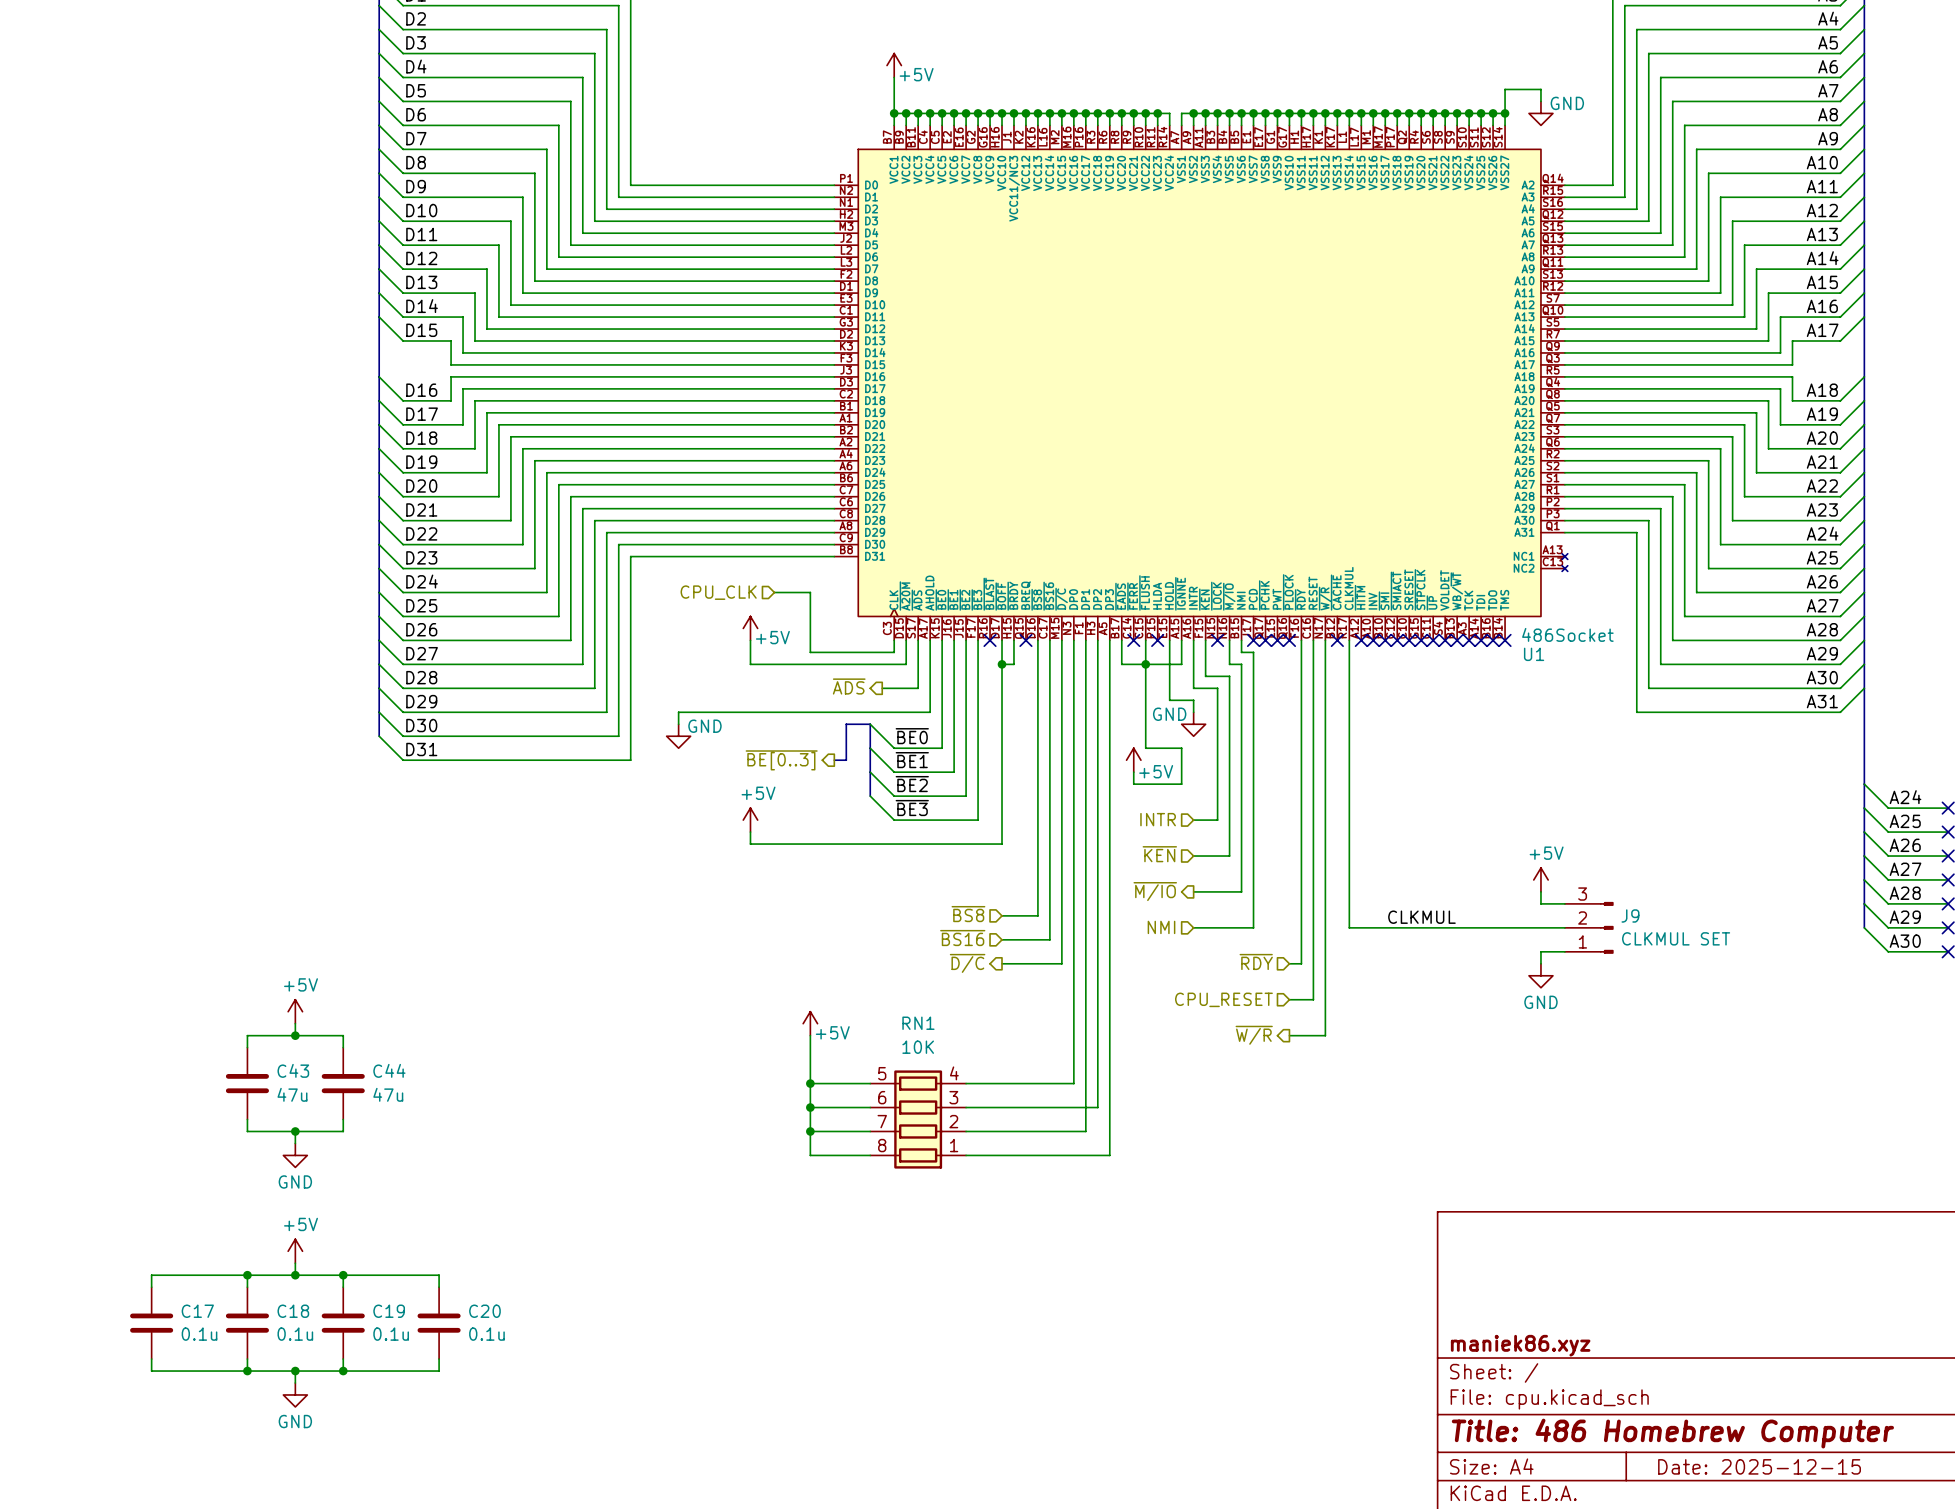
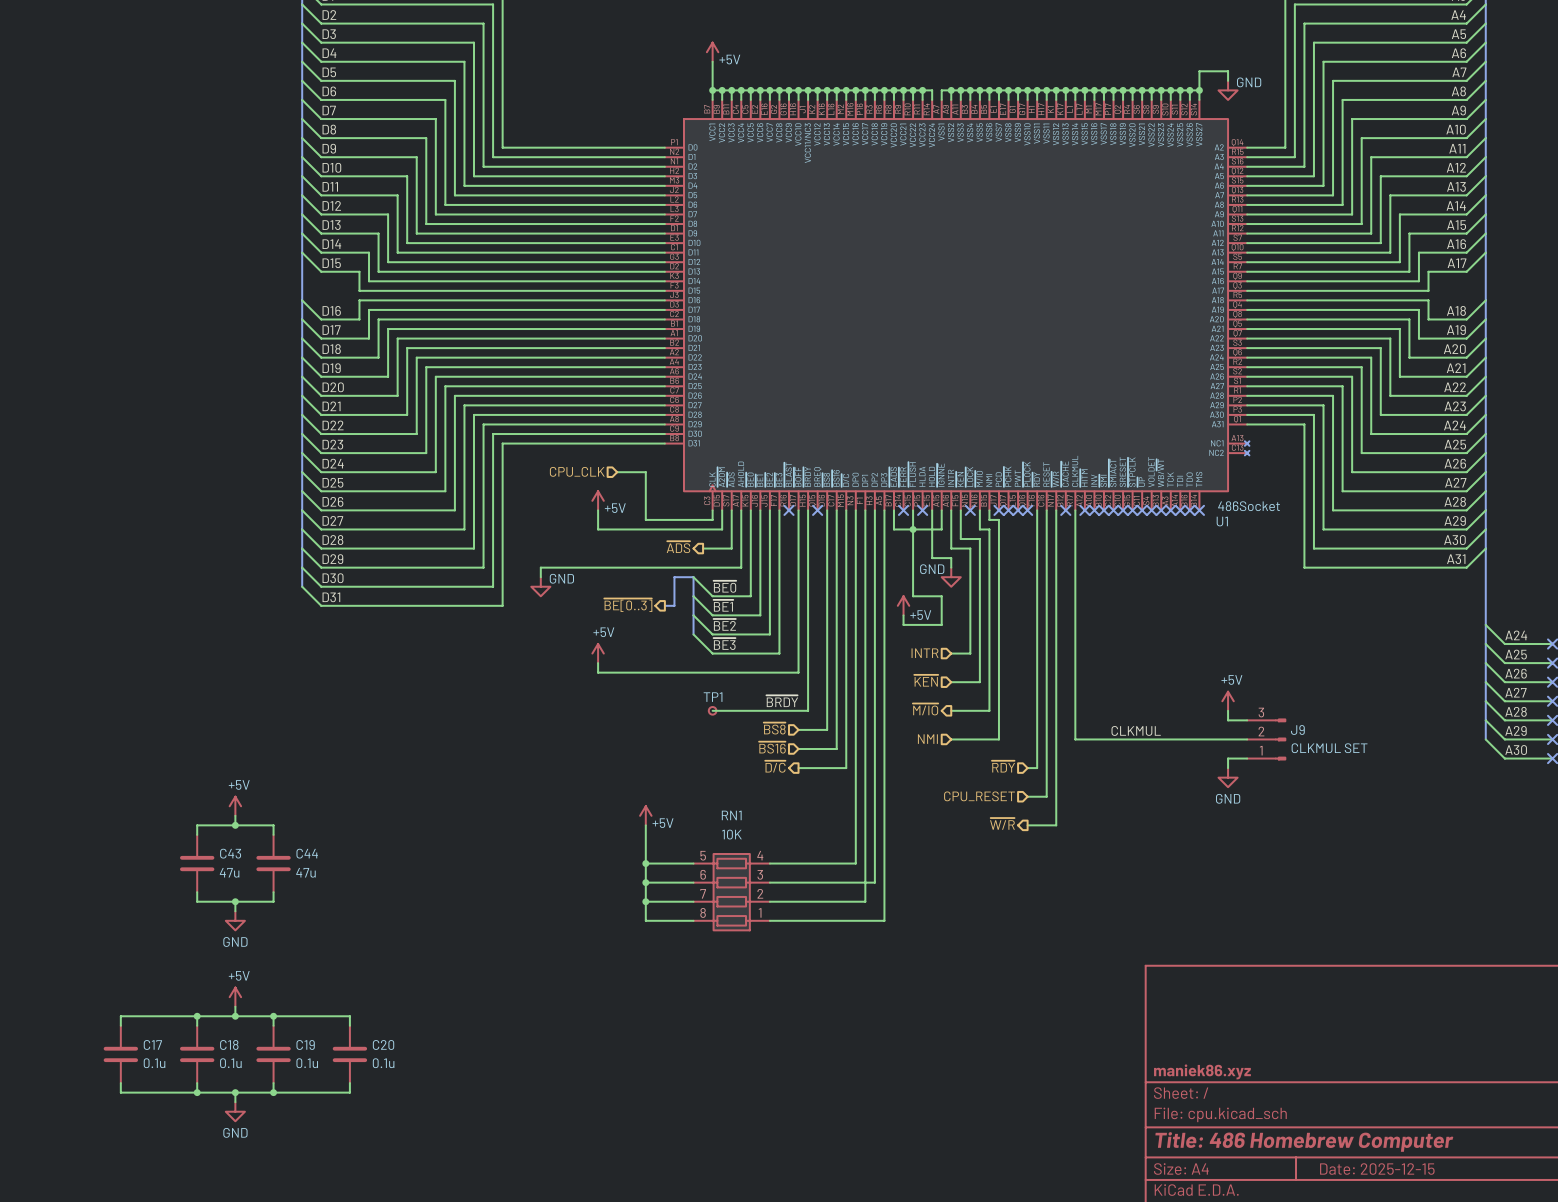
wire: (1002, 664) (1013, 664) -> (712, 710) (808, 710) (808, 529)
junction: (1002, 664) -> none
label: none -> ~{BRDY} (782, 701)
TP1: none -> (712, 710)

